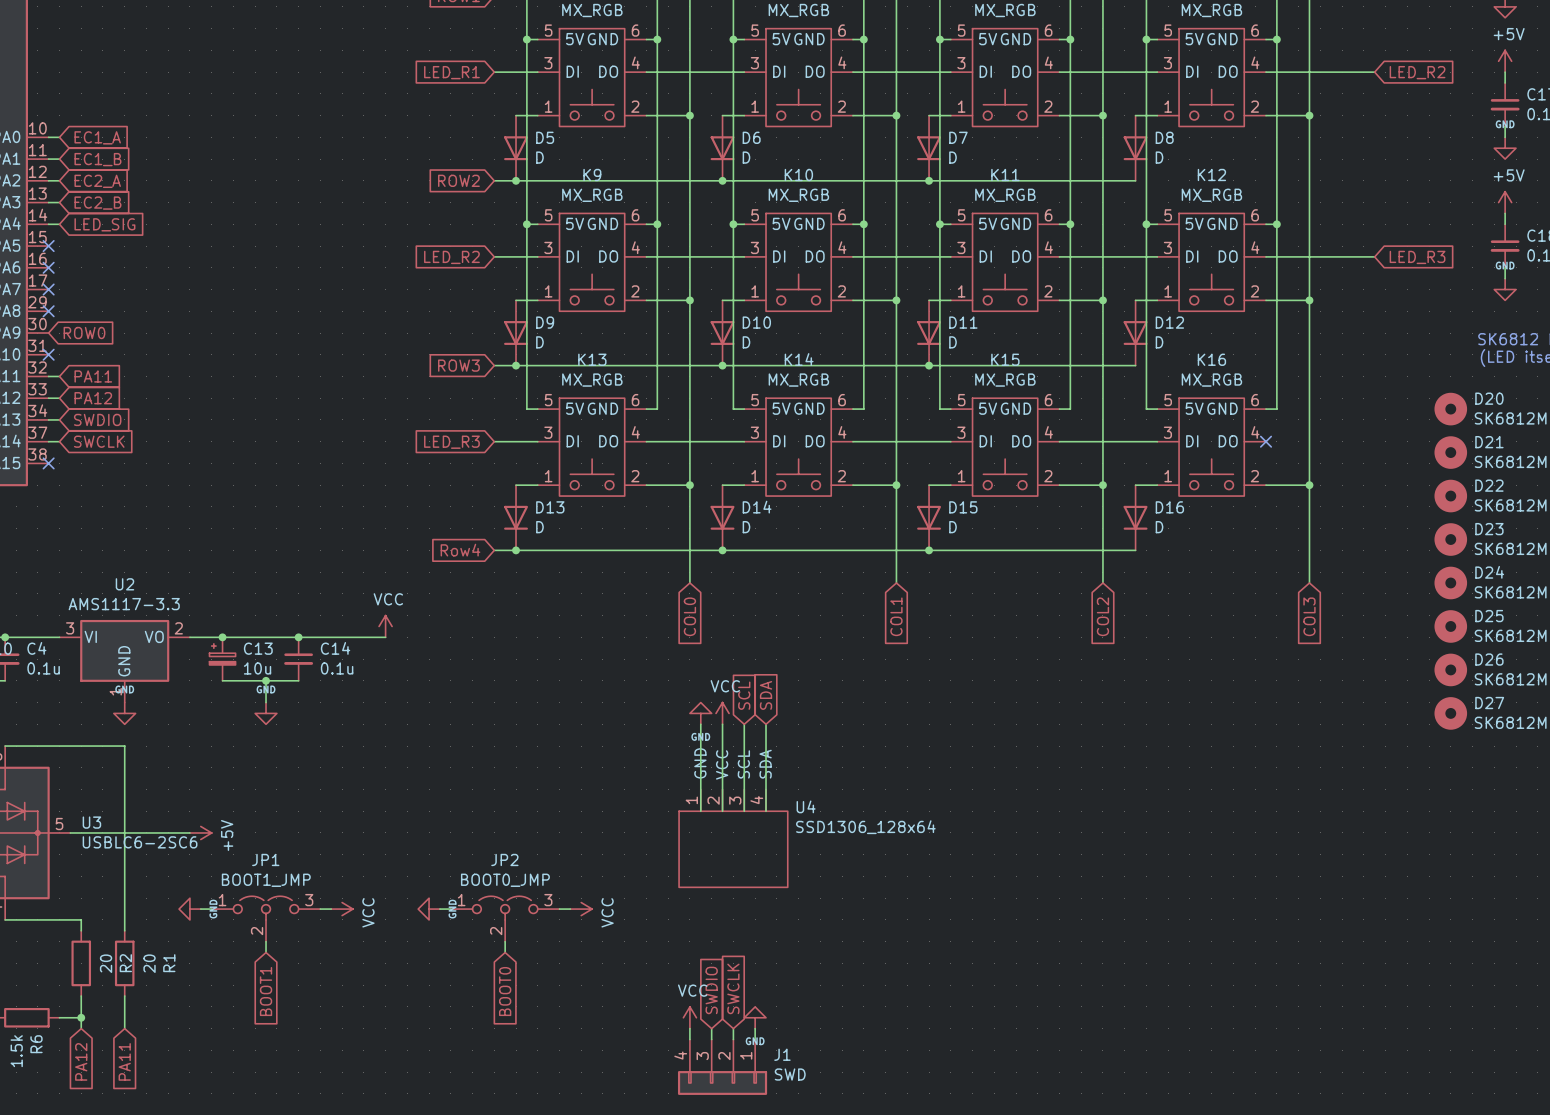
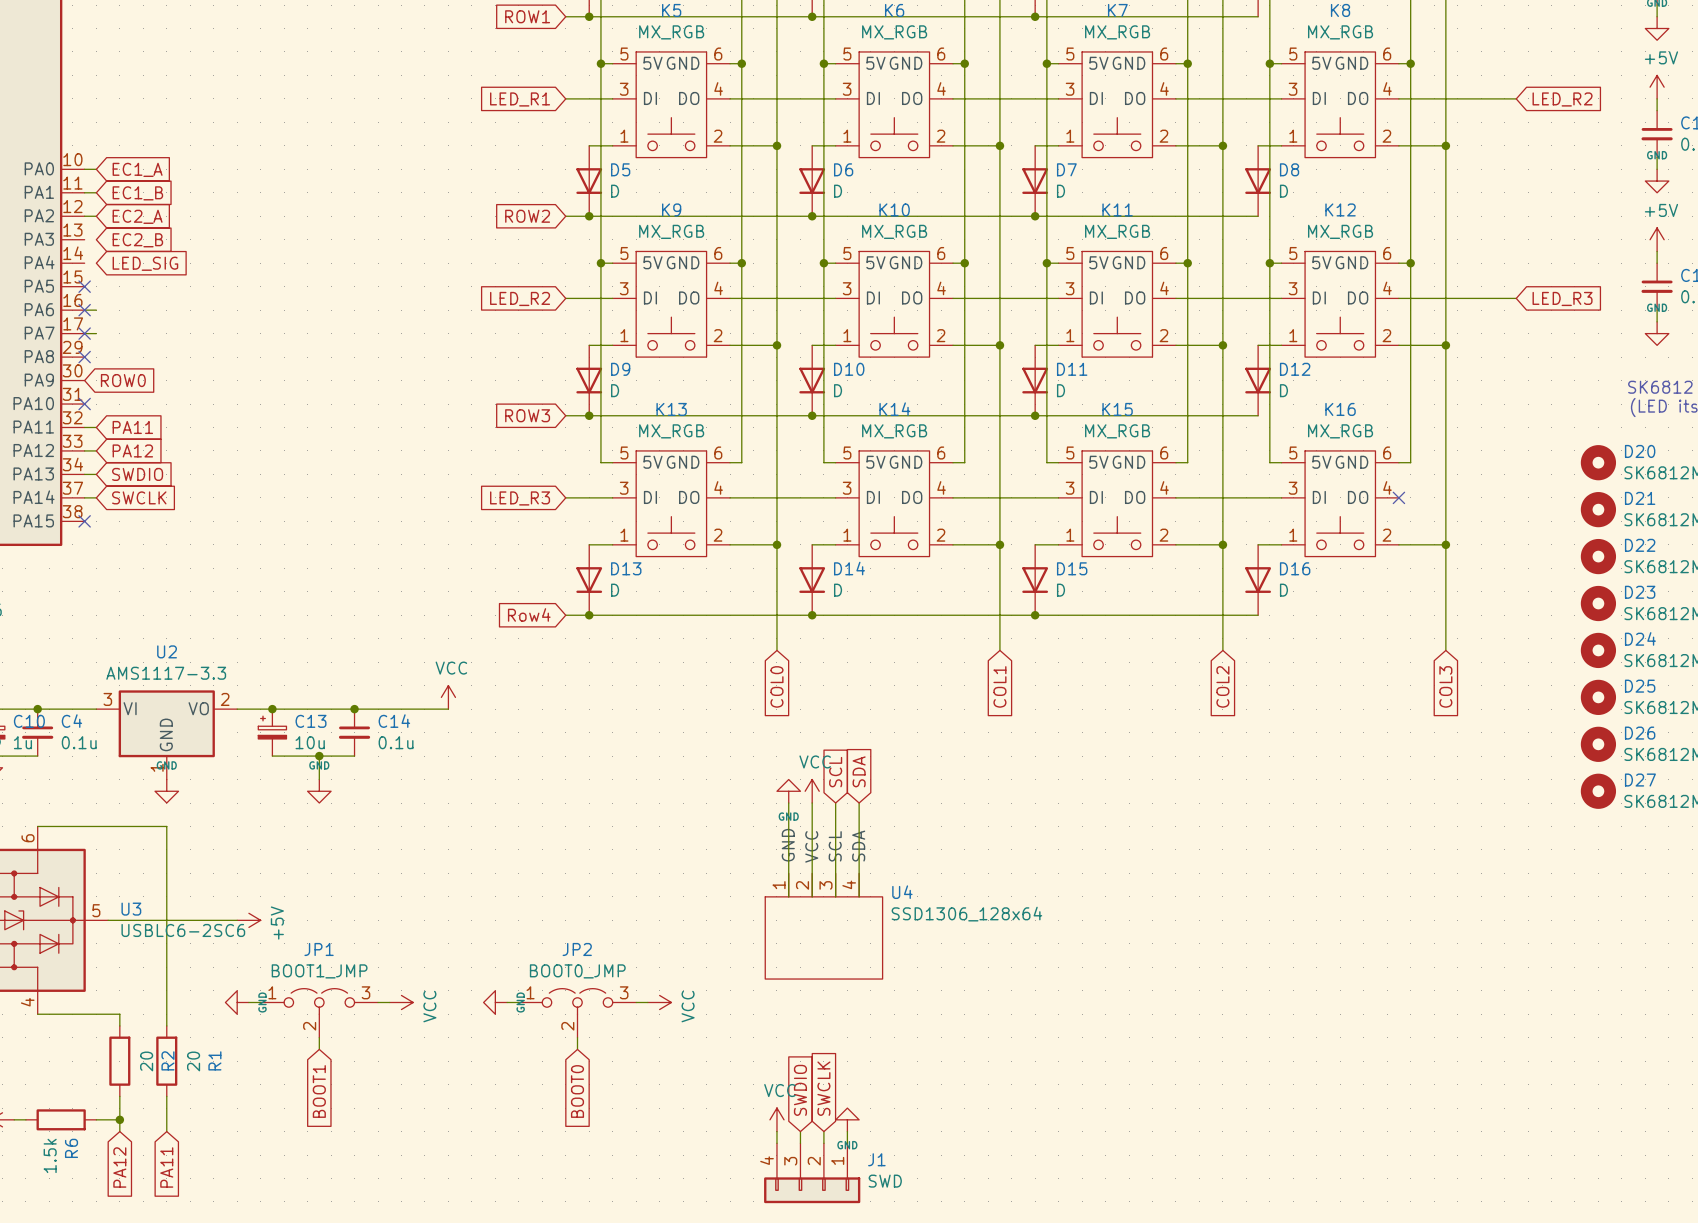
wire: (48, 202) (59, 202) -> (84, 310) (96, 310)
wire: (48, 224) (59, 224) -> (84, 333) (96, 333)

